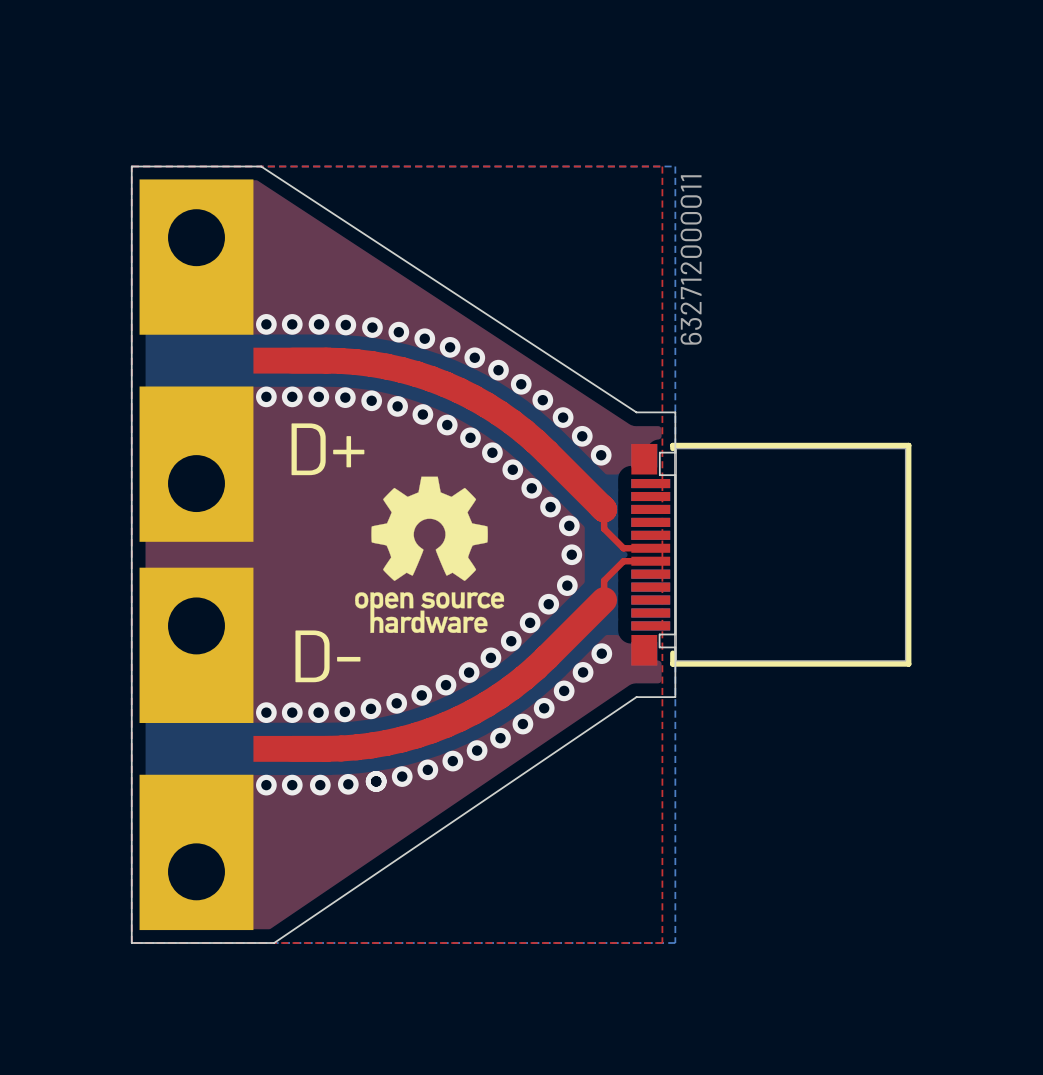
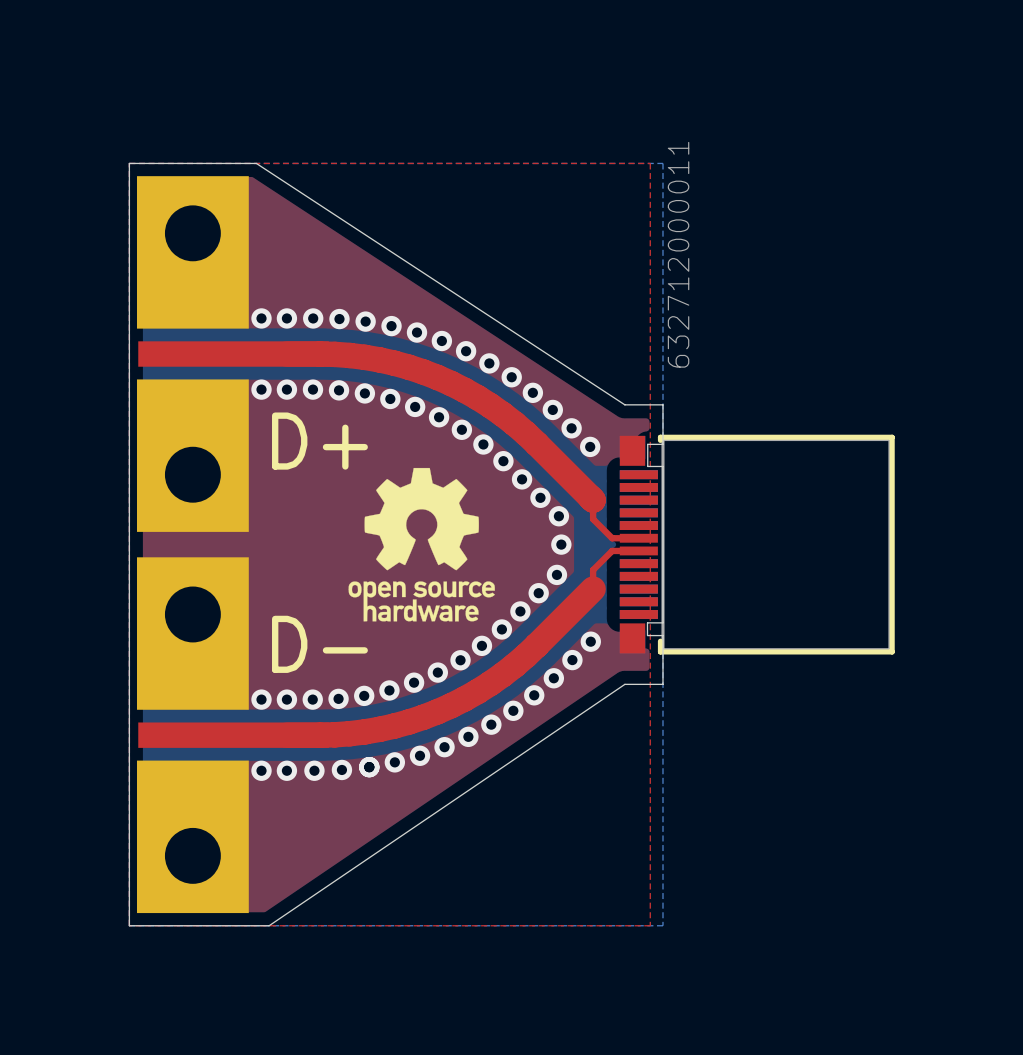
part footprint: [139, 179, 332, 542] -> [136, 176, 329, 532]
part footprint: [139, 567, 332, 931] -> [136, 557, 329, 914]

